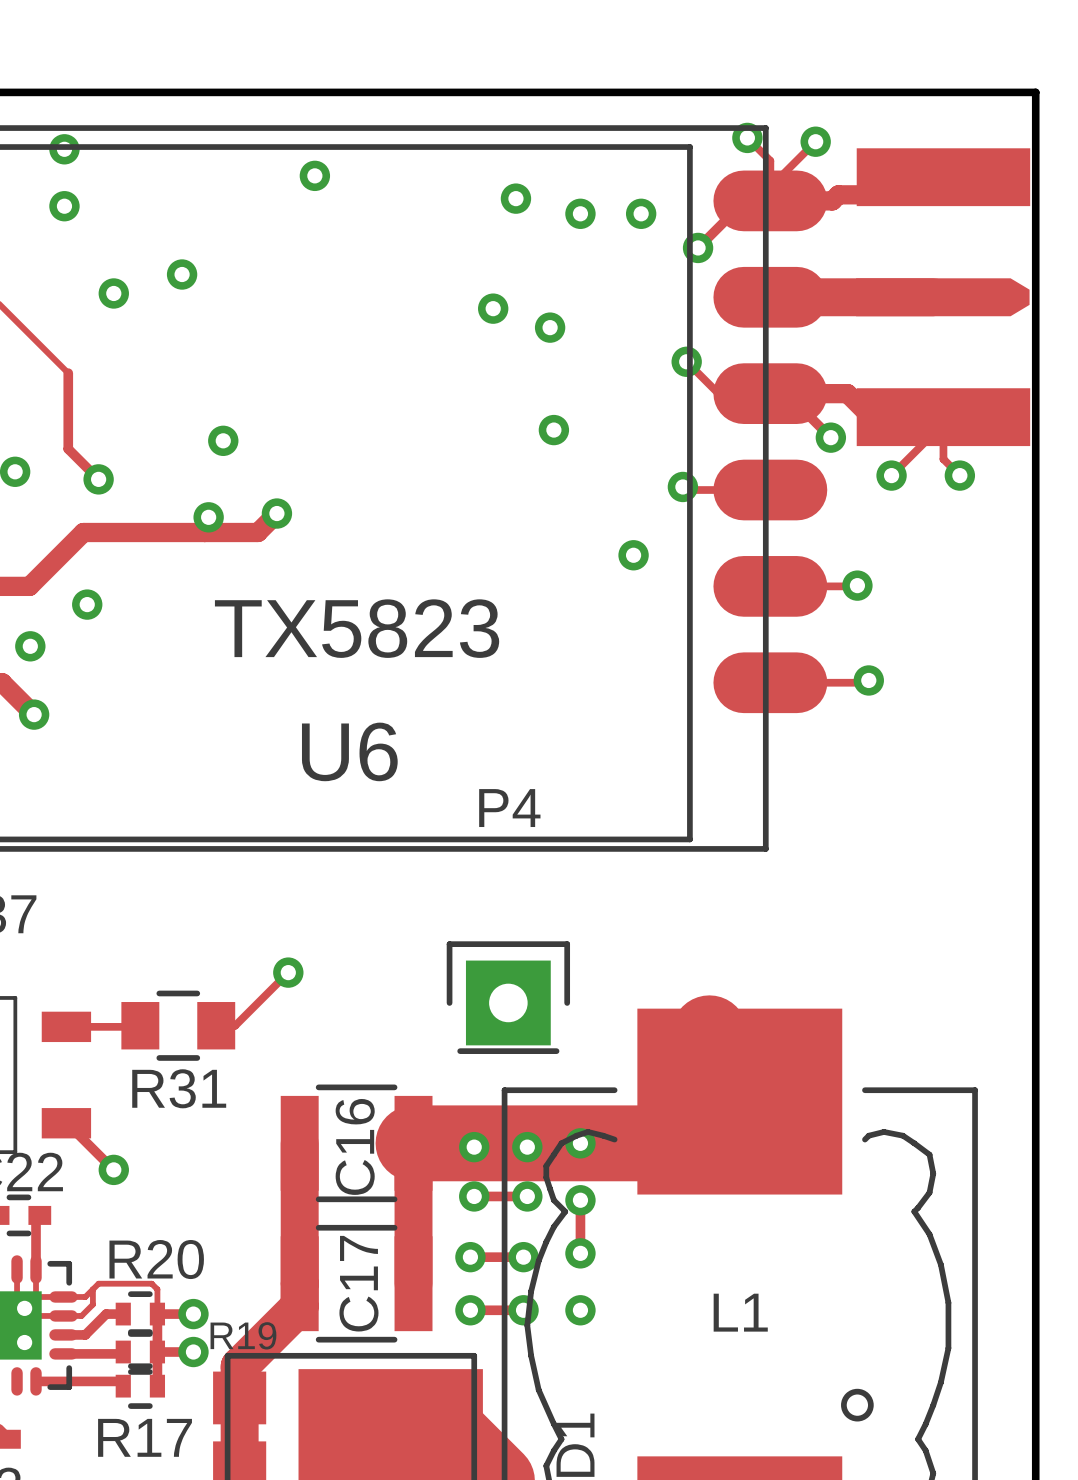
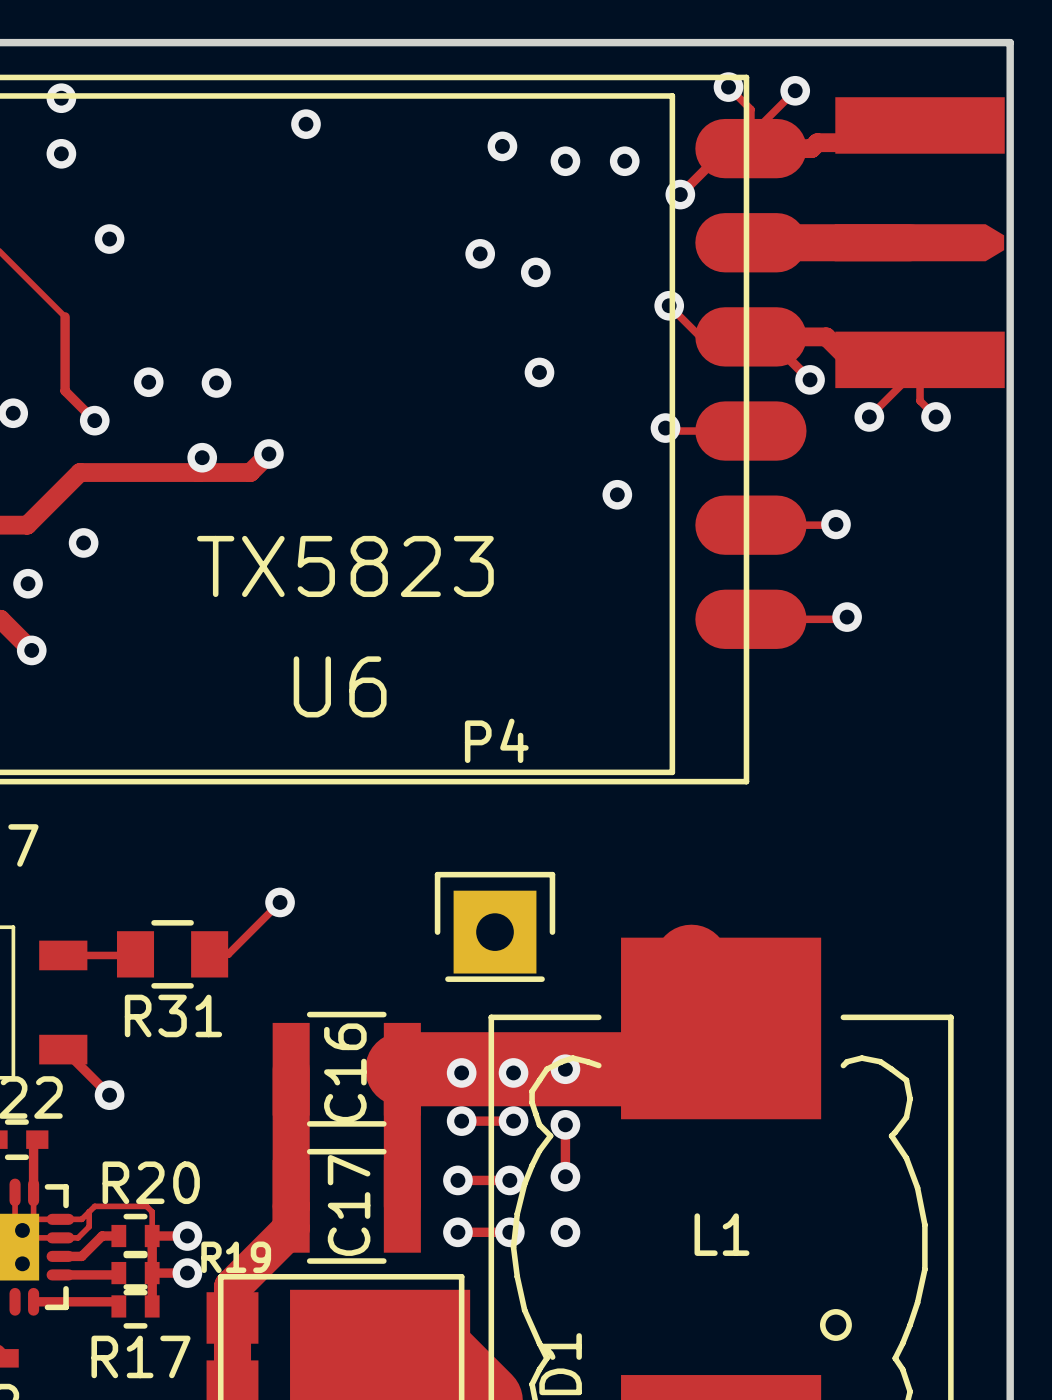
via position: (182, 274) -> (148, 382)

